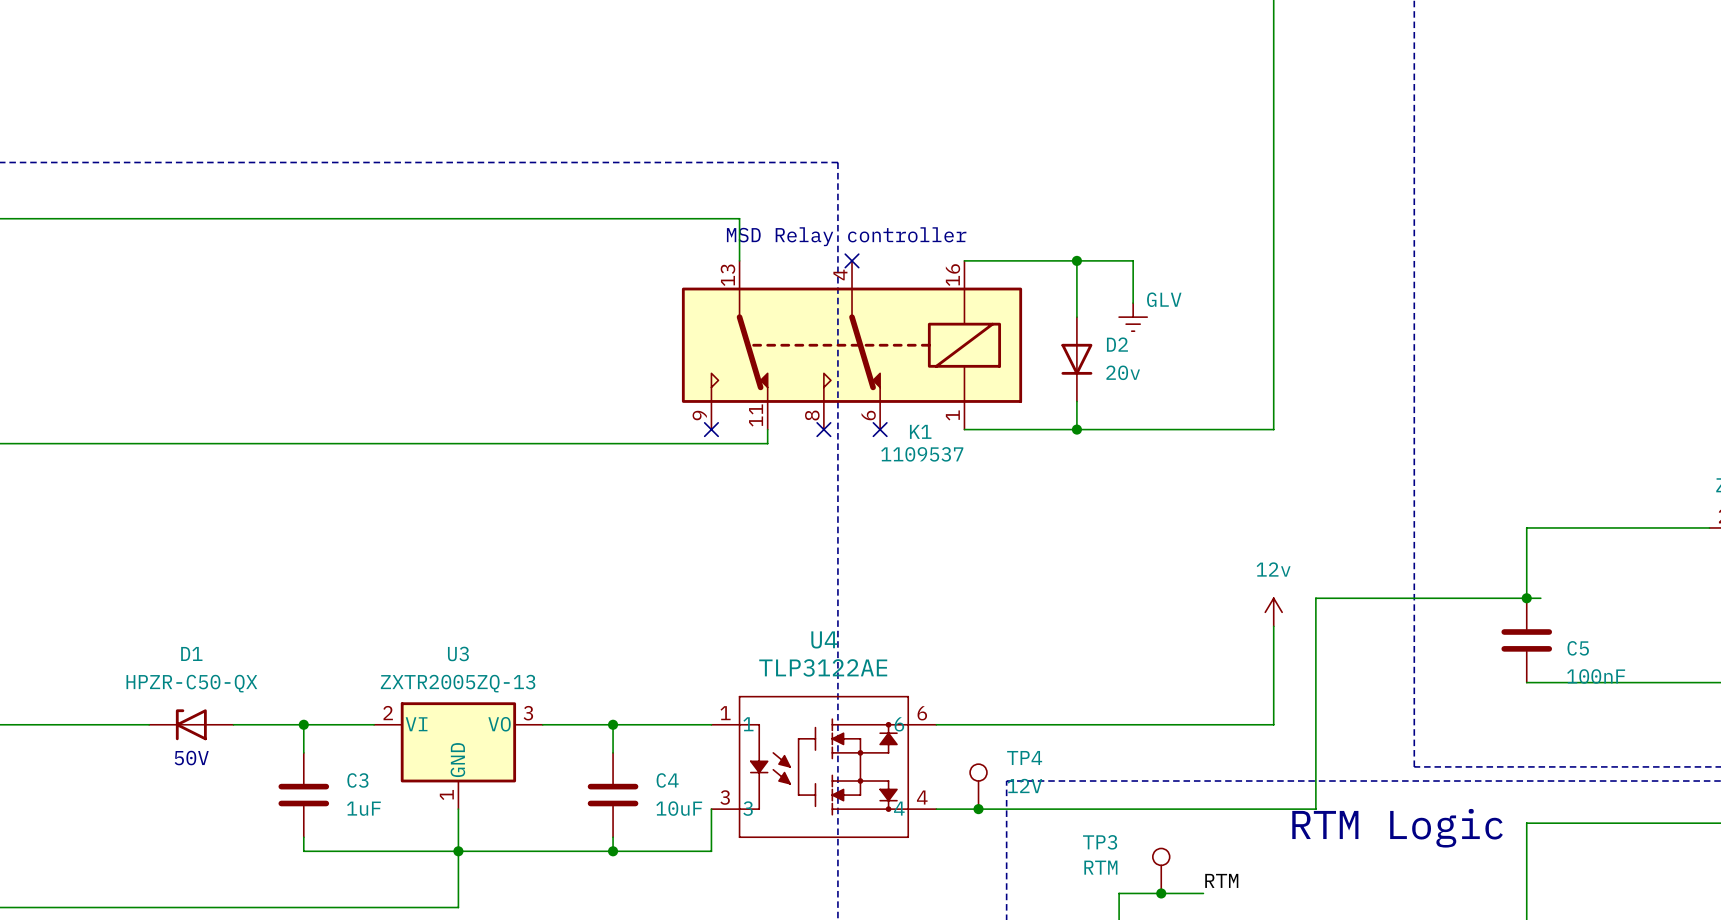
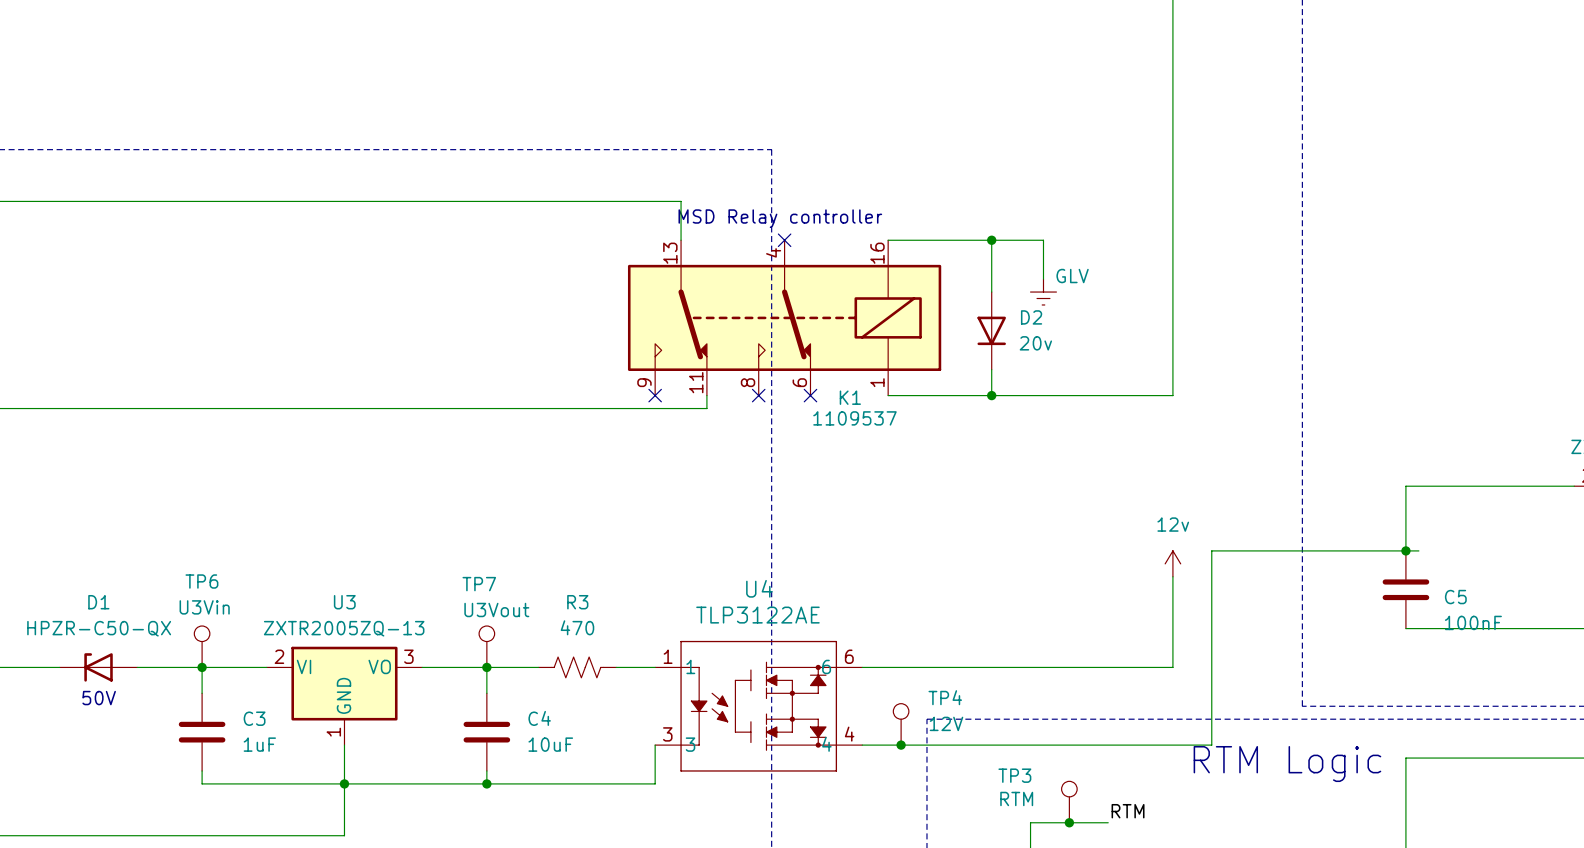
TP6: none -> U3Vin (202, 646)
TP7: none -> U3Vout (486, 646)
D1 position: (191, 724) -> (98, 667)
junction: none -> (202, 667)
wire: (303, 724) (303, 752) -> (202, 667) (202, 693)
junction: (303, 724) -> none
junction: none -> (486, 667)
wire: (613, 724) (613, 752) -> (486, 667) (486, 693)
junction: (613, 724) -> none
R3: none -> 470 (577, 667)
U3 position: (458, 755) -> (344, 695)
text position: 50V (191, 758) -> 50V (99, 698)
C3 position: (303, 795) -> (202, 732)
C4 position: (613, 795) -> (486, 732)
wire: (458, 809) (458, 907) (374, 907) -> (344, 745) (344, 835)
wire: (303, 837) (303, 851) -> (202, 770) (202, 783) (279, 783)
wire: (613, 837) (613, 851) -> (486, 770) (486, 783)
junction: none -> (344, 783)
junction: (458, 851) -> none
junction: none -> (486, 783)
junction: (613, 851) -> none

